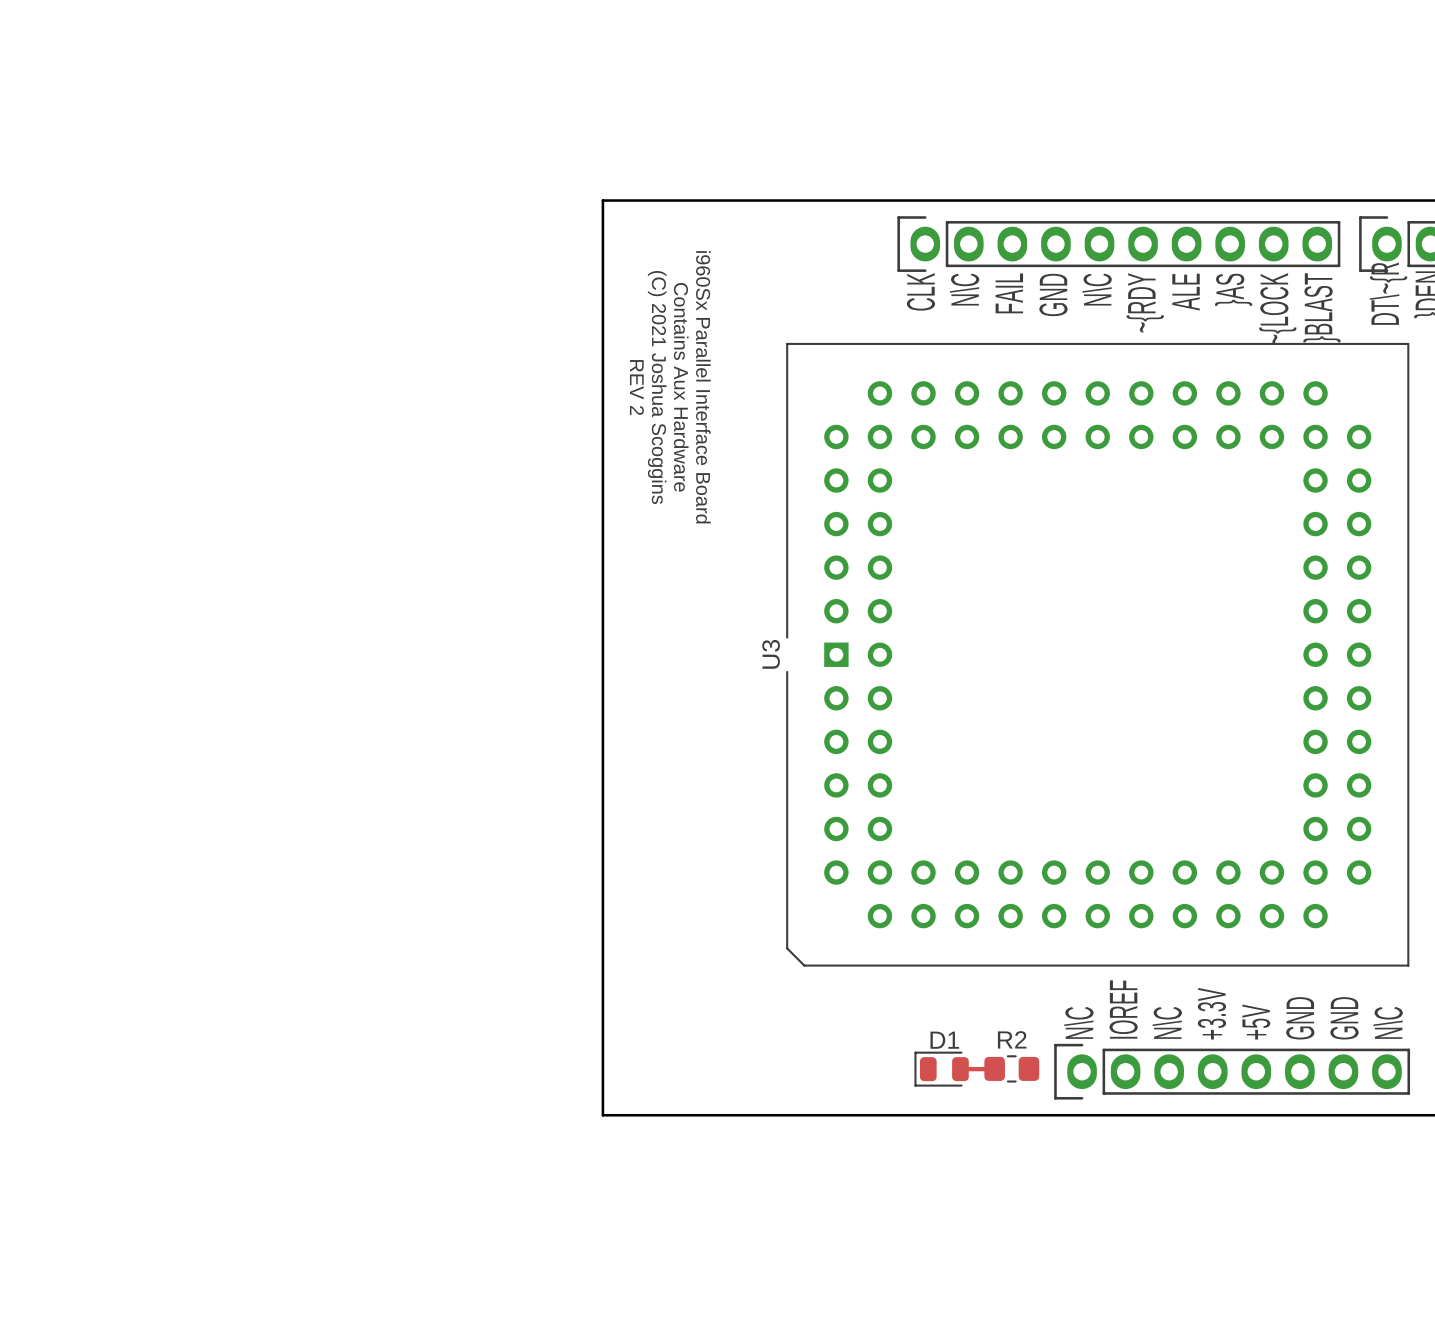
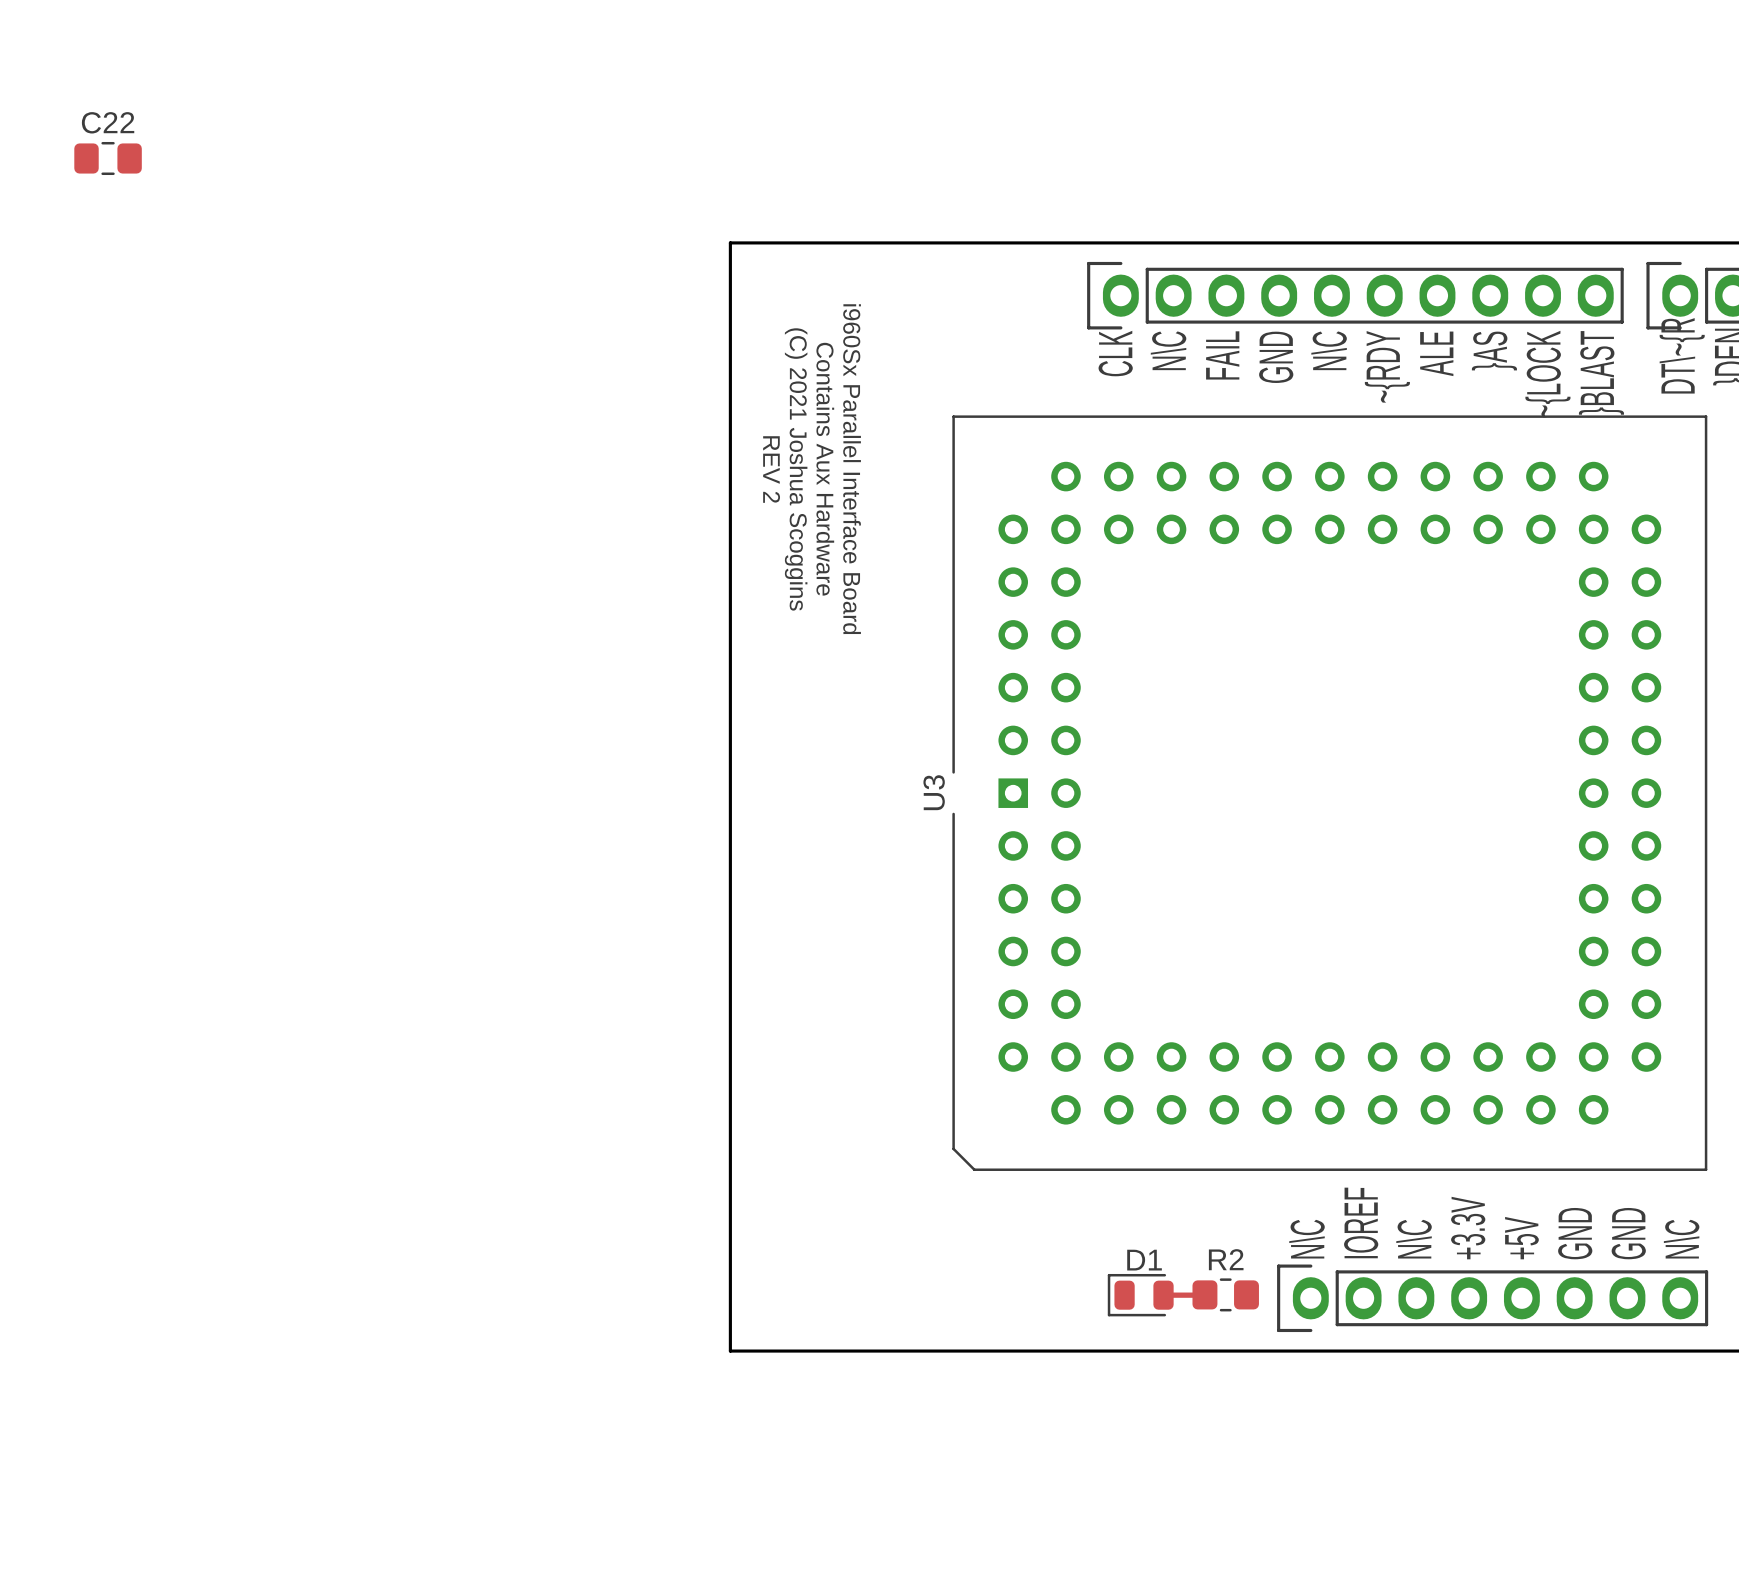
C22: none -> (108, 158)

